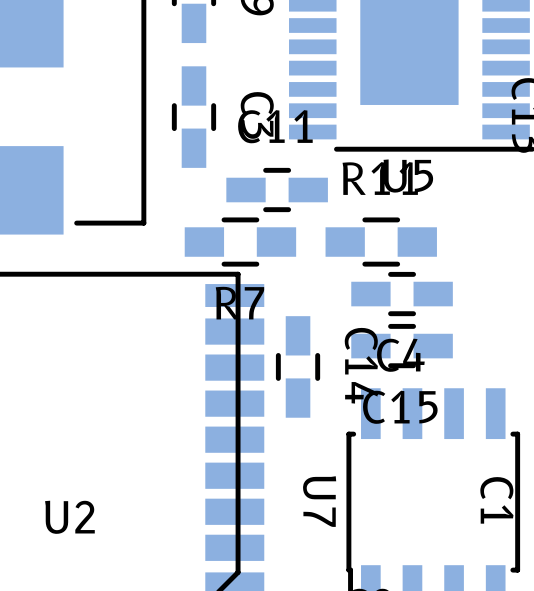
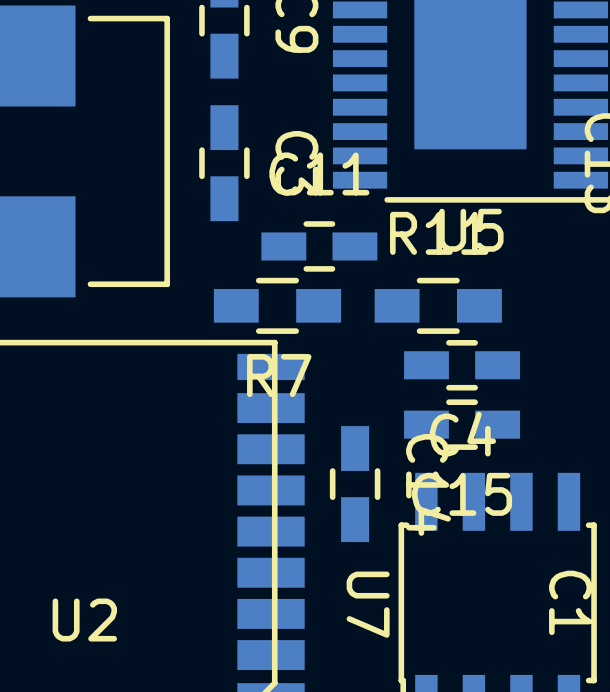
C14 position: (298, 366) -> (355, 484)

